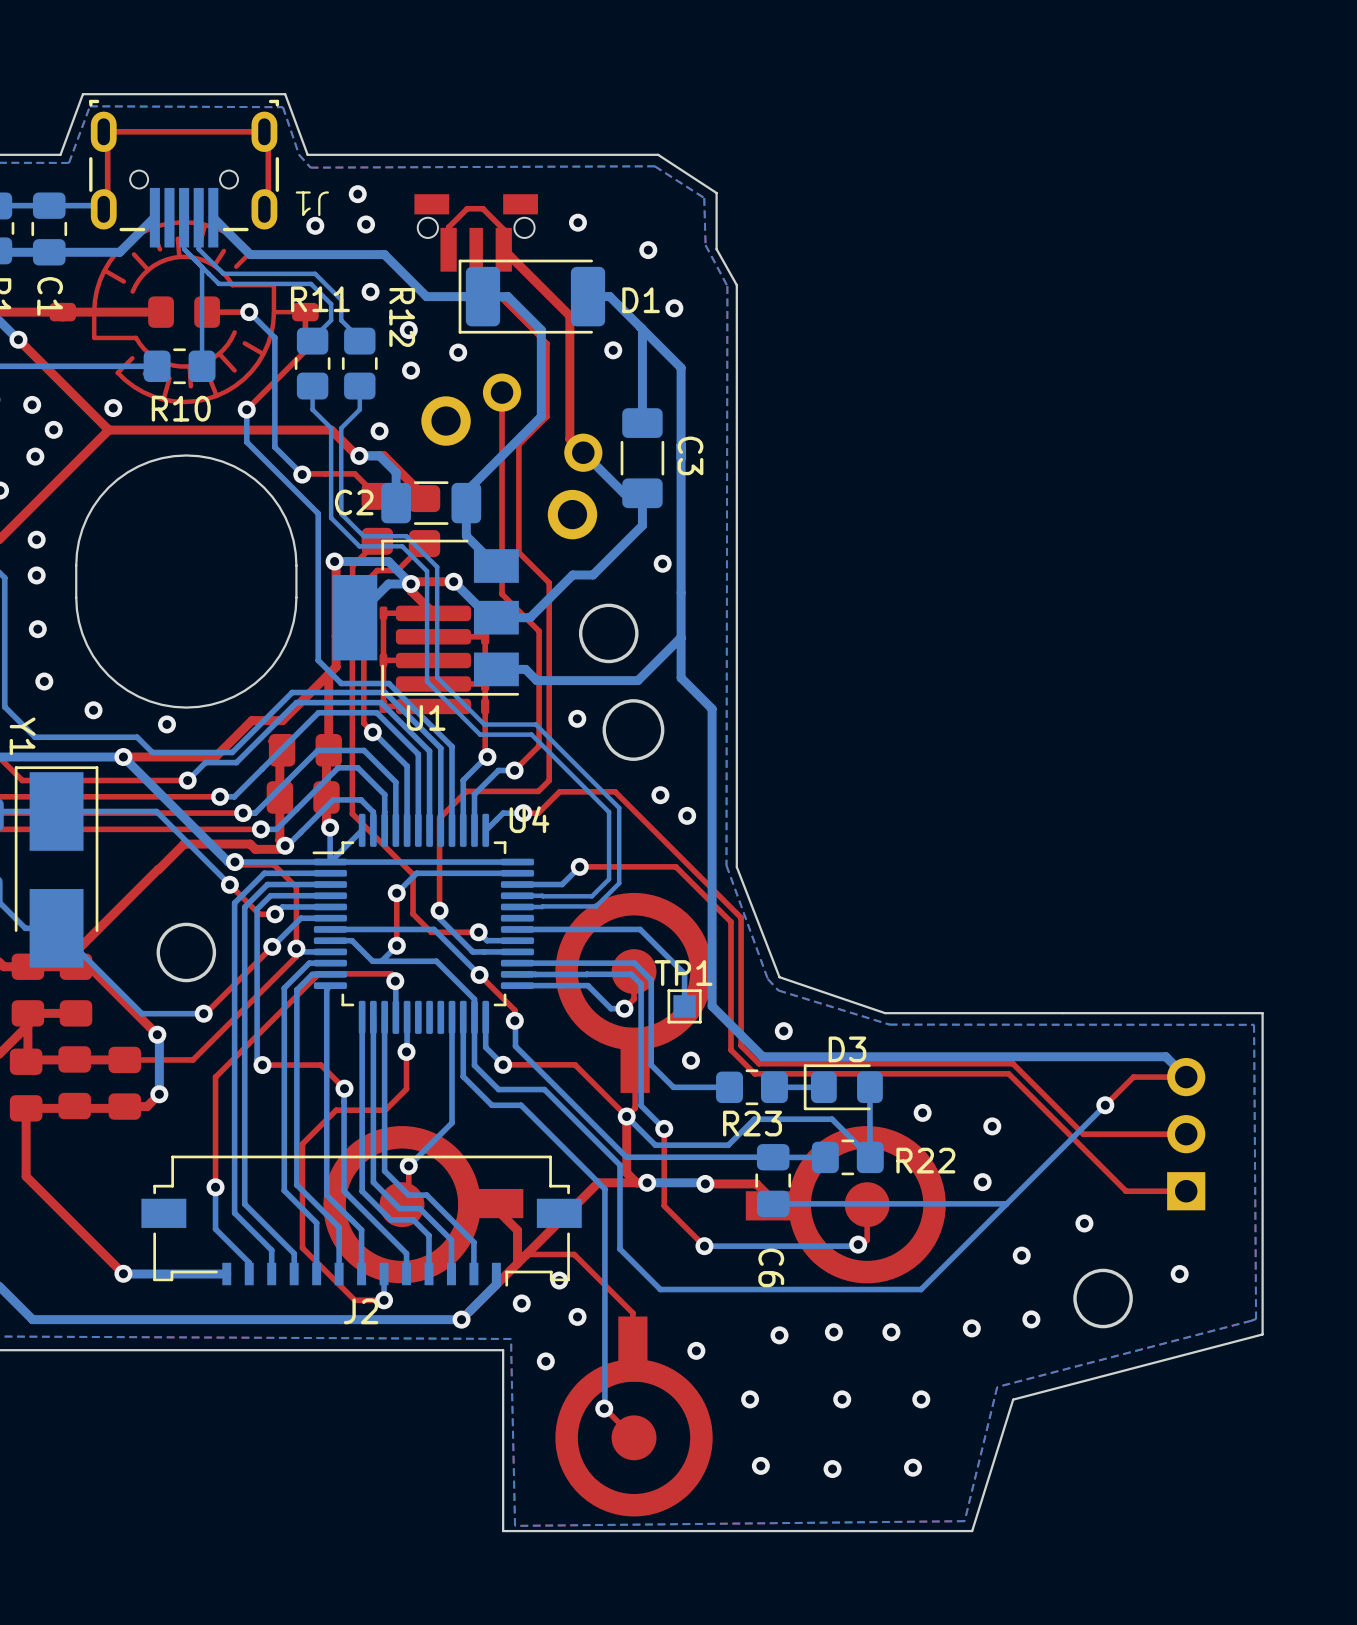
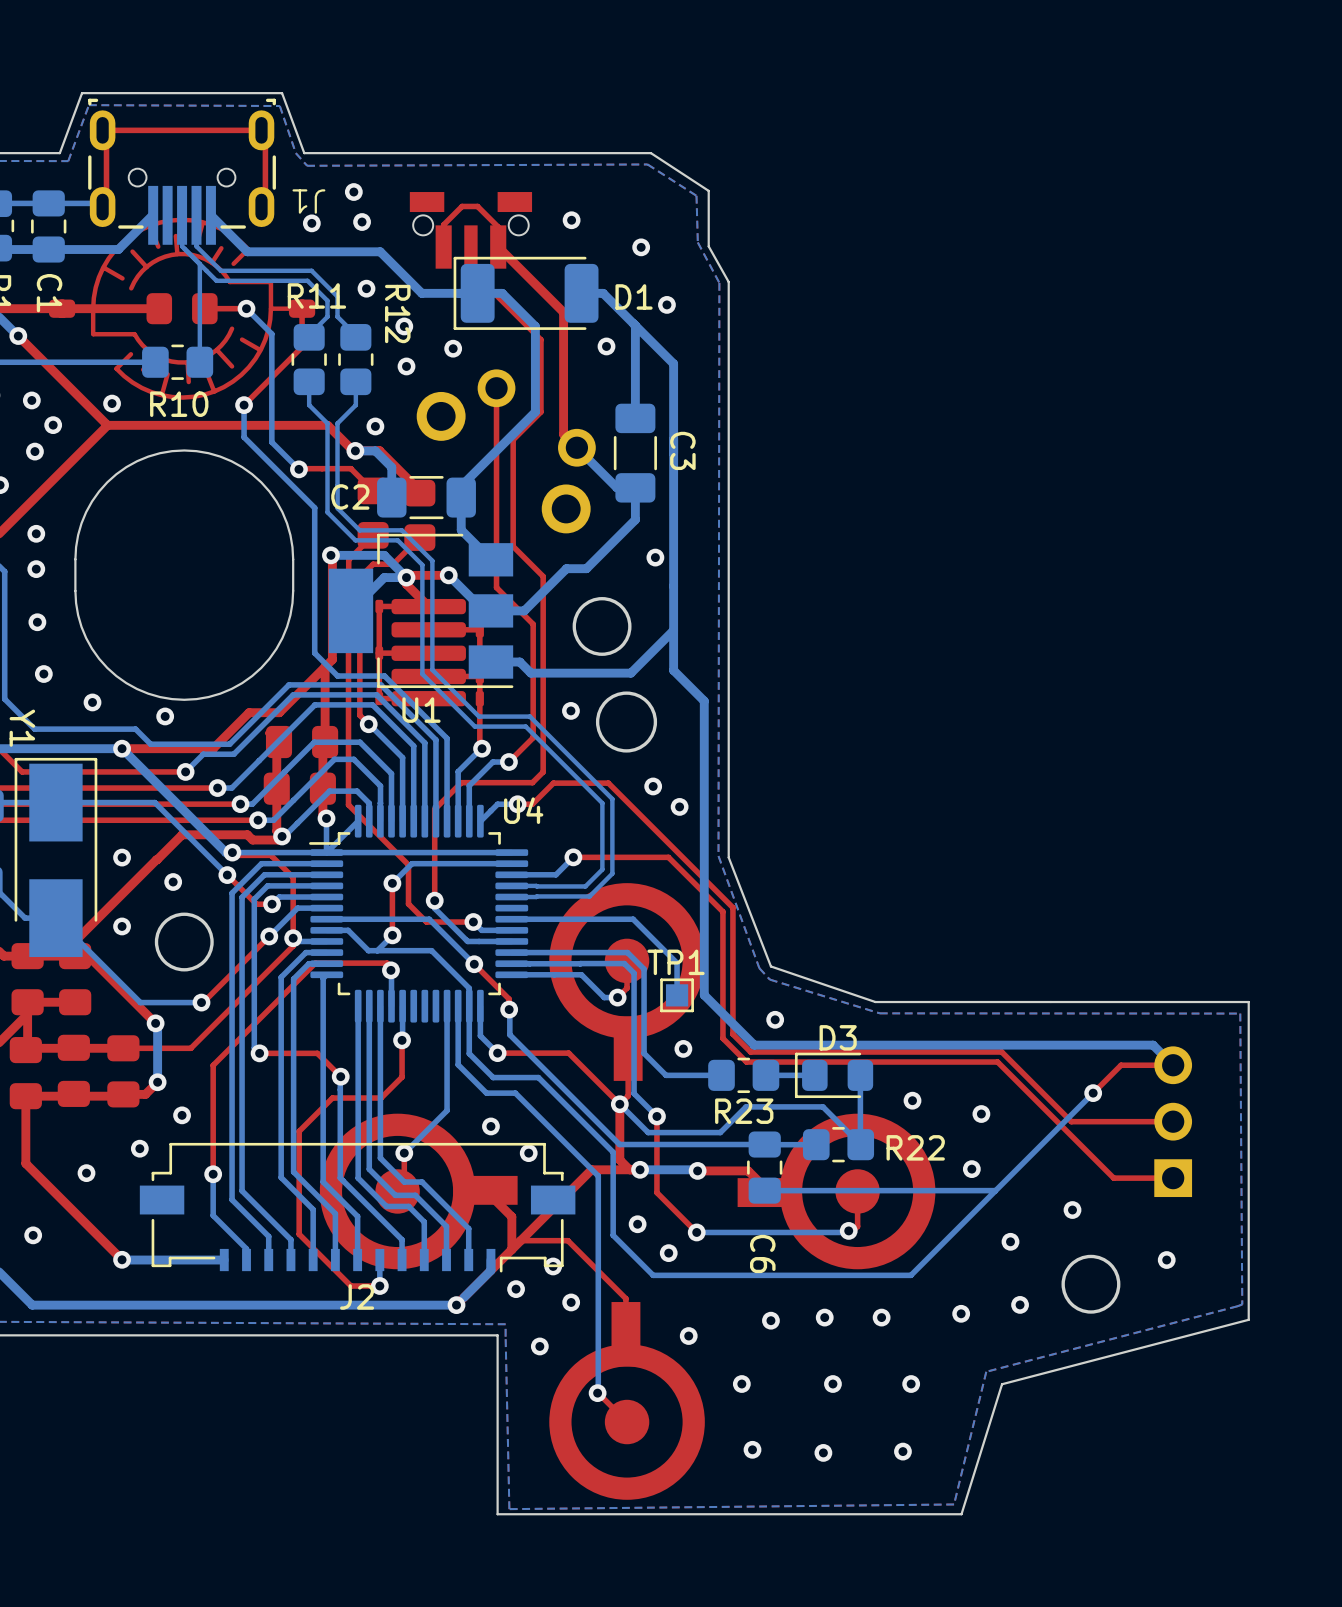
via: none -> (122, 857)
via: none -> (173, 882)
via: none -> (122, 926)
via: none -> (182, 1115)
via: none -> (490, 1126)
via: none -> (139, 1148)
via: none -> (528, 1153)
via: none -> (86, 1173)
via: none -> (637, 1224)
via: none -> (33, 1235)
via: none -> (668, 1253)

